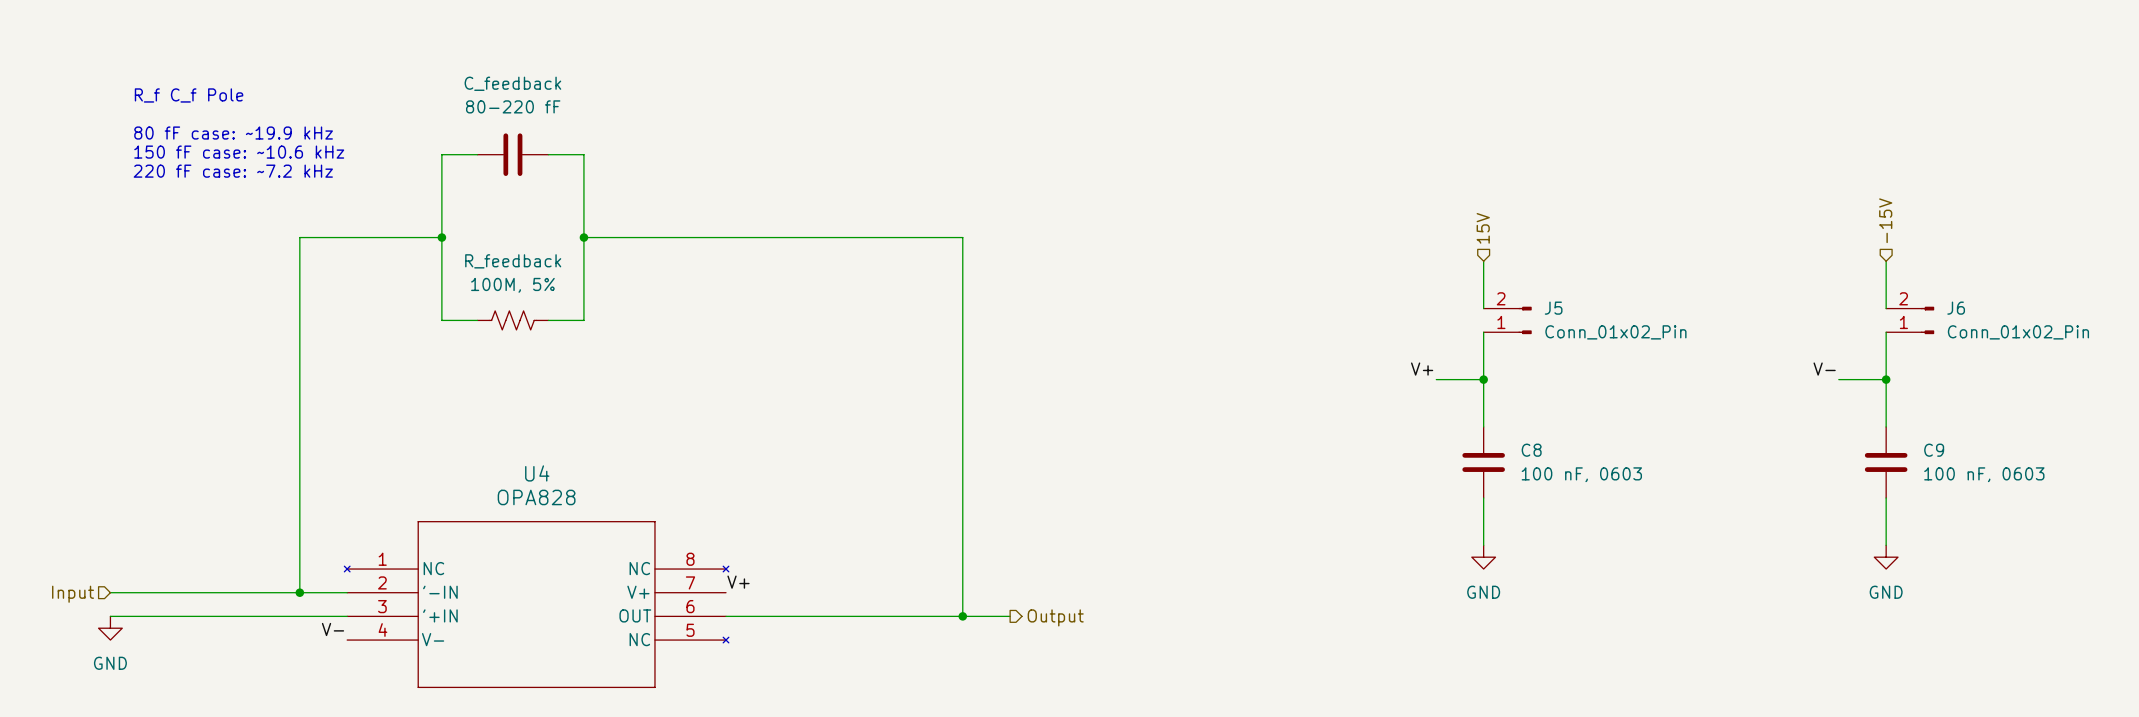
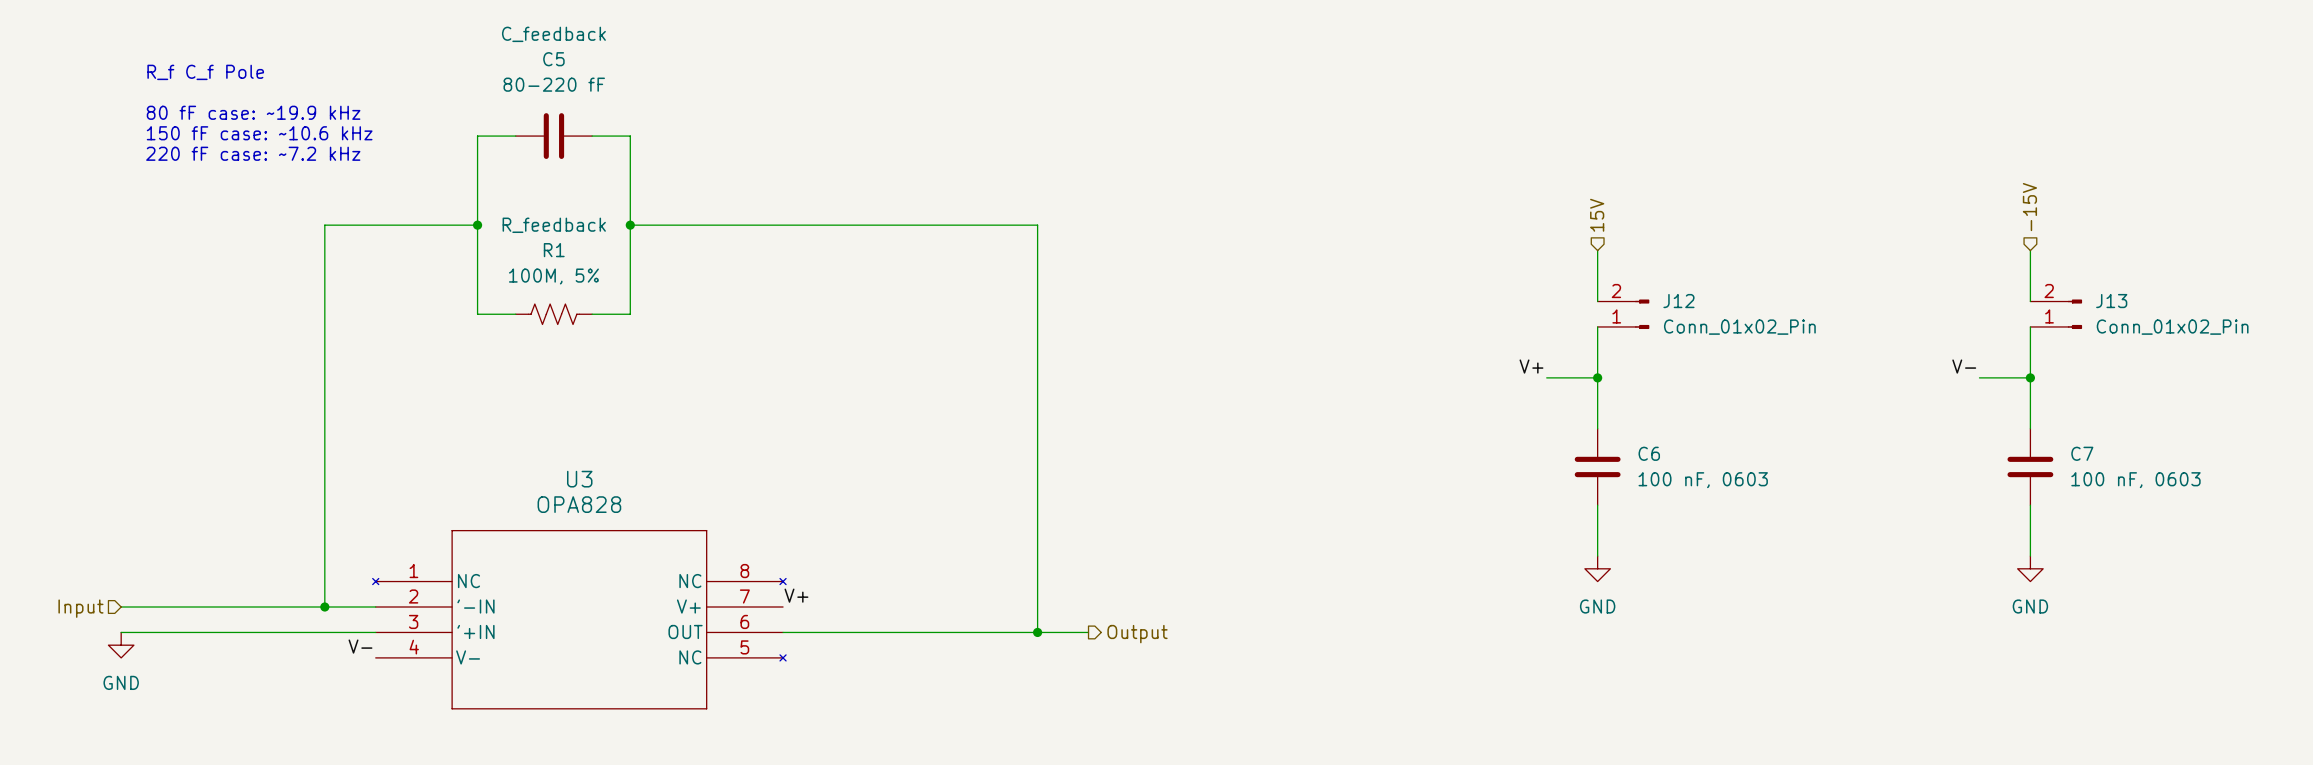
C_feedback text: none -> C_feedback (553, 34)
C_feedback name: C_feedback (512, 83) -> C5 (553, 59)
R_feedback text: none -> R_feedback (554, 225)
R_feedback name: R_feedback (513, 261) -> R1 (554, 250)
J5 name: J5 (1553, 308) -> J12 (1678, 301)
J6 name: J6 (1956, 308) -> J13 (2111, 301)
C8 name: C8 (1531, 450) -> C6 (1649, 453)
C9 name: C9 (1934, 450) -> C7 (2082, 453)
U4 name: U4 (537, 473) -> U3 (579, 479)

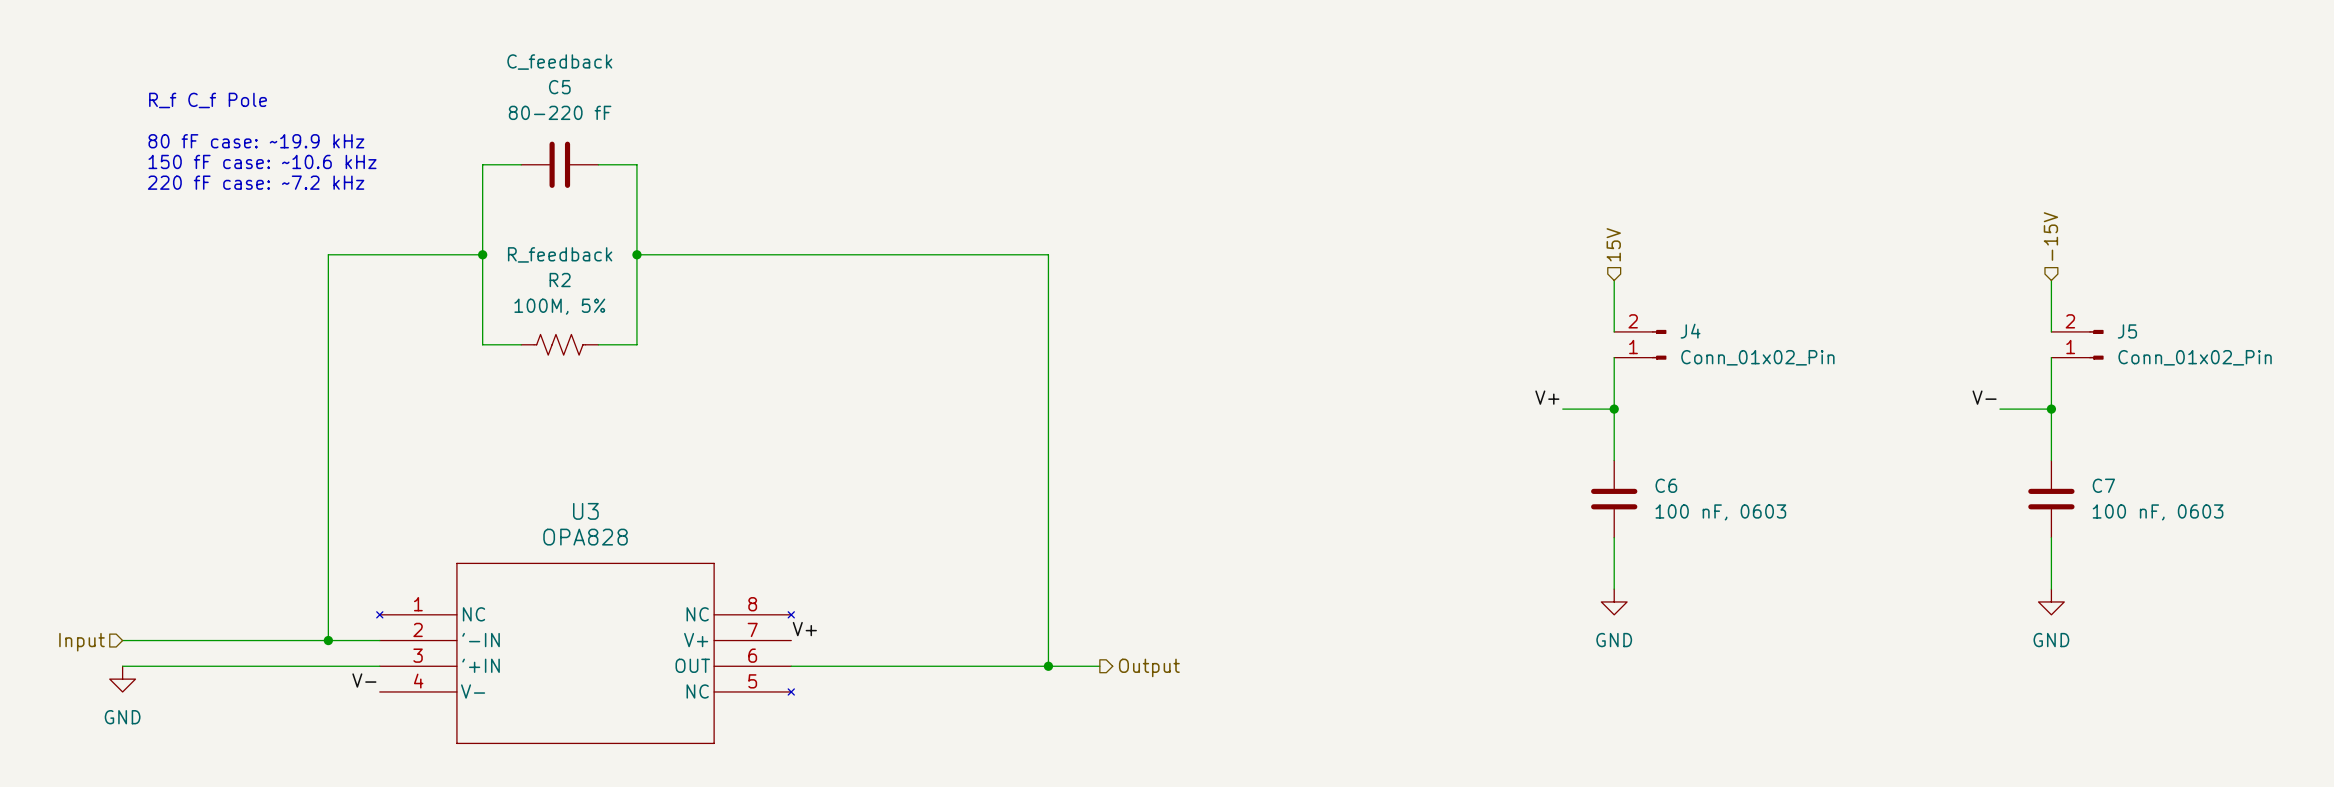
R1 name: R1 (554, 250) -> R2 (560, 280)
J12 name: J12 (1678, 301) -> J4 (1690, 331)
J13 name: J13 (2111, 301) -> J5 (2127, 331)

